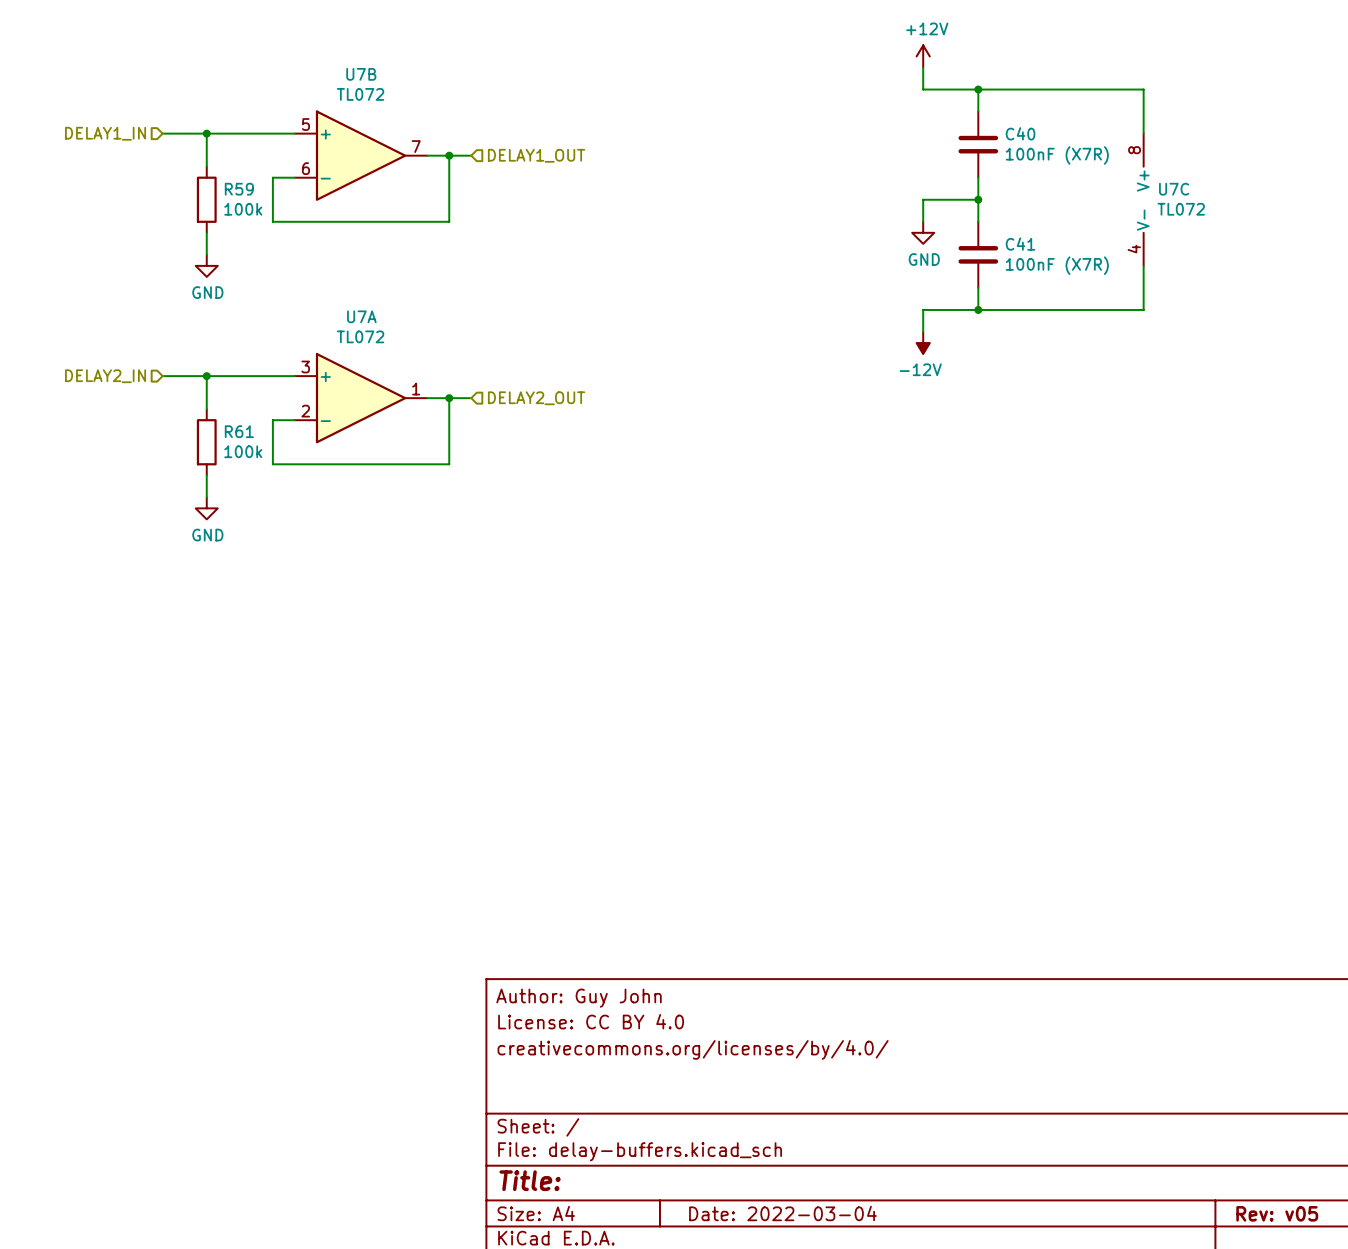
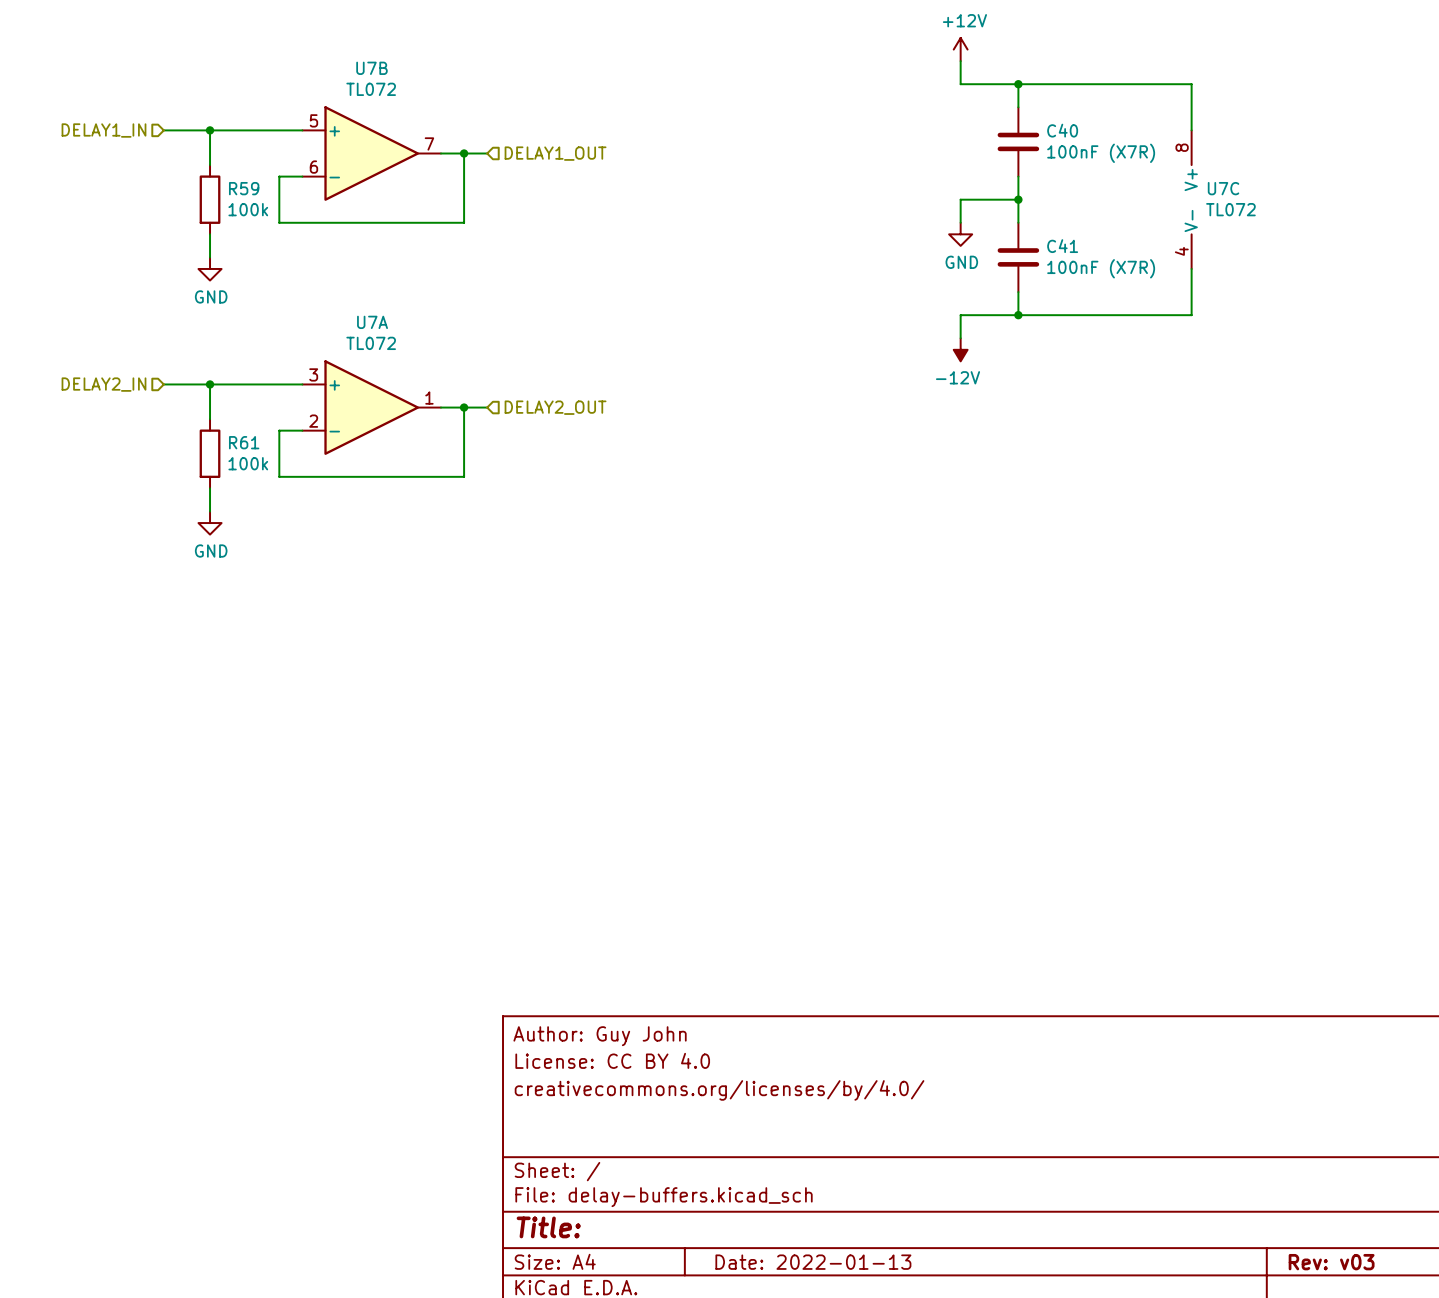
title block: Date: 2022-03-04 (782, 1213) -> Date: 2022-01-13 (813, 1262)
title block: Rev: v05 (1277, 1213) -> Rev: v03 (1331, 1262)

